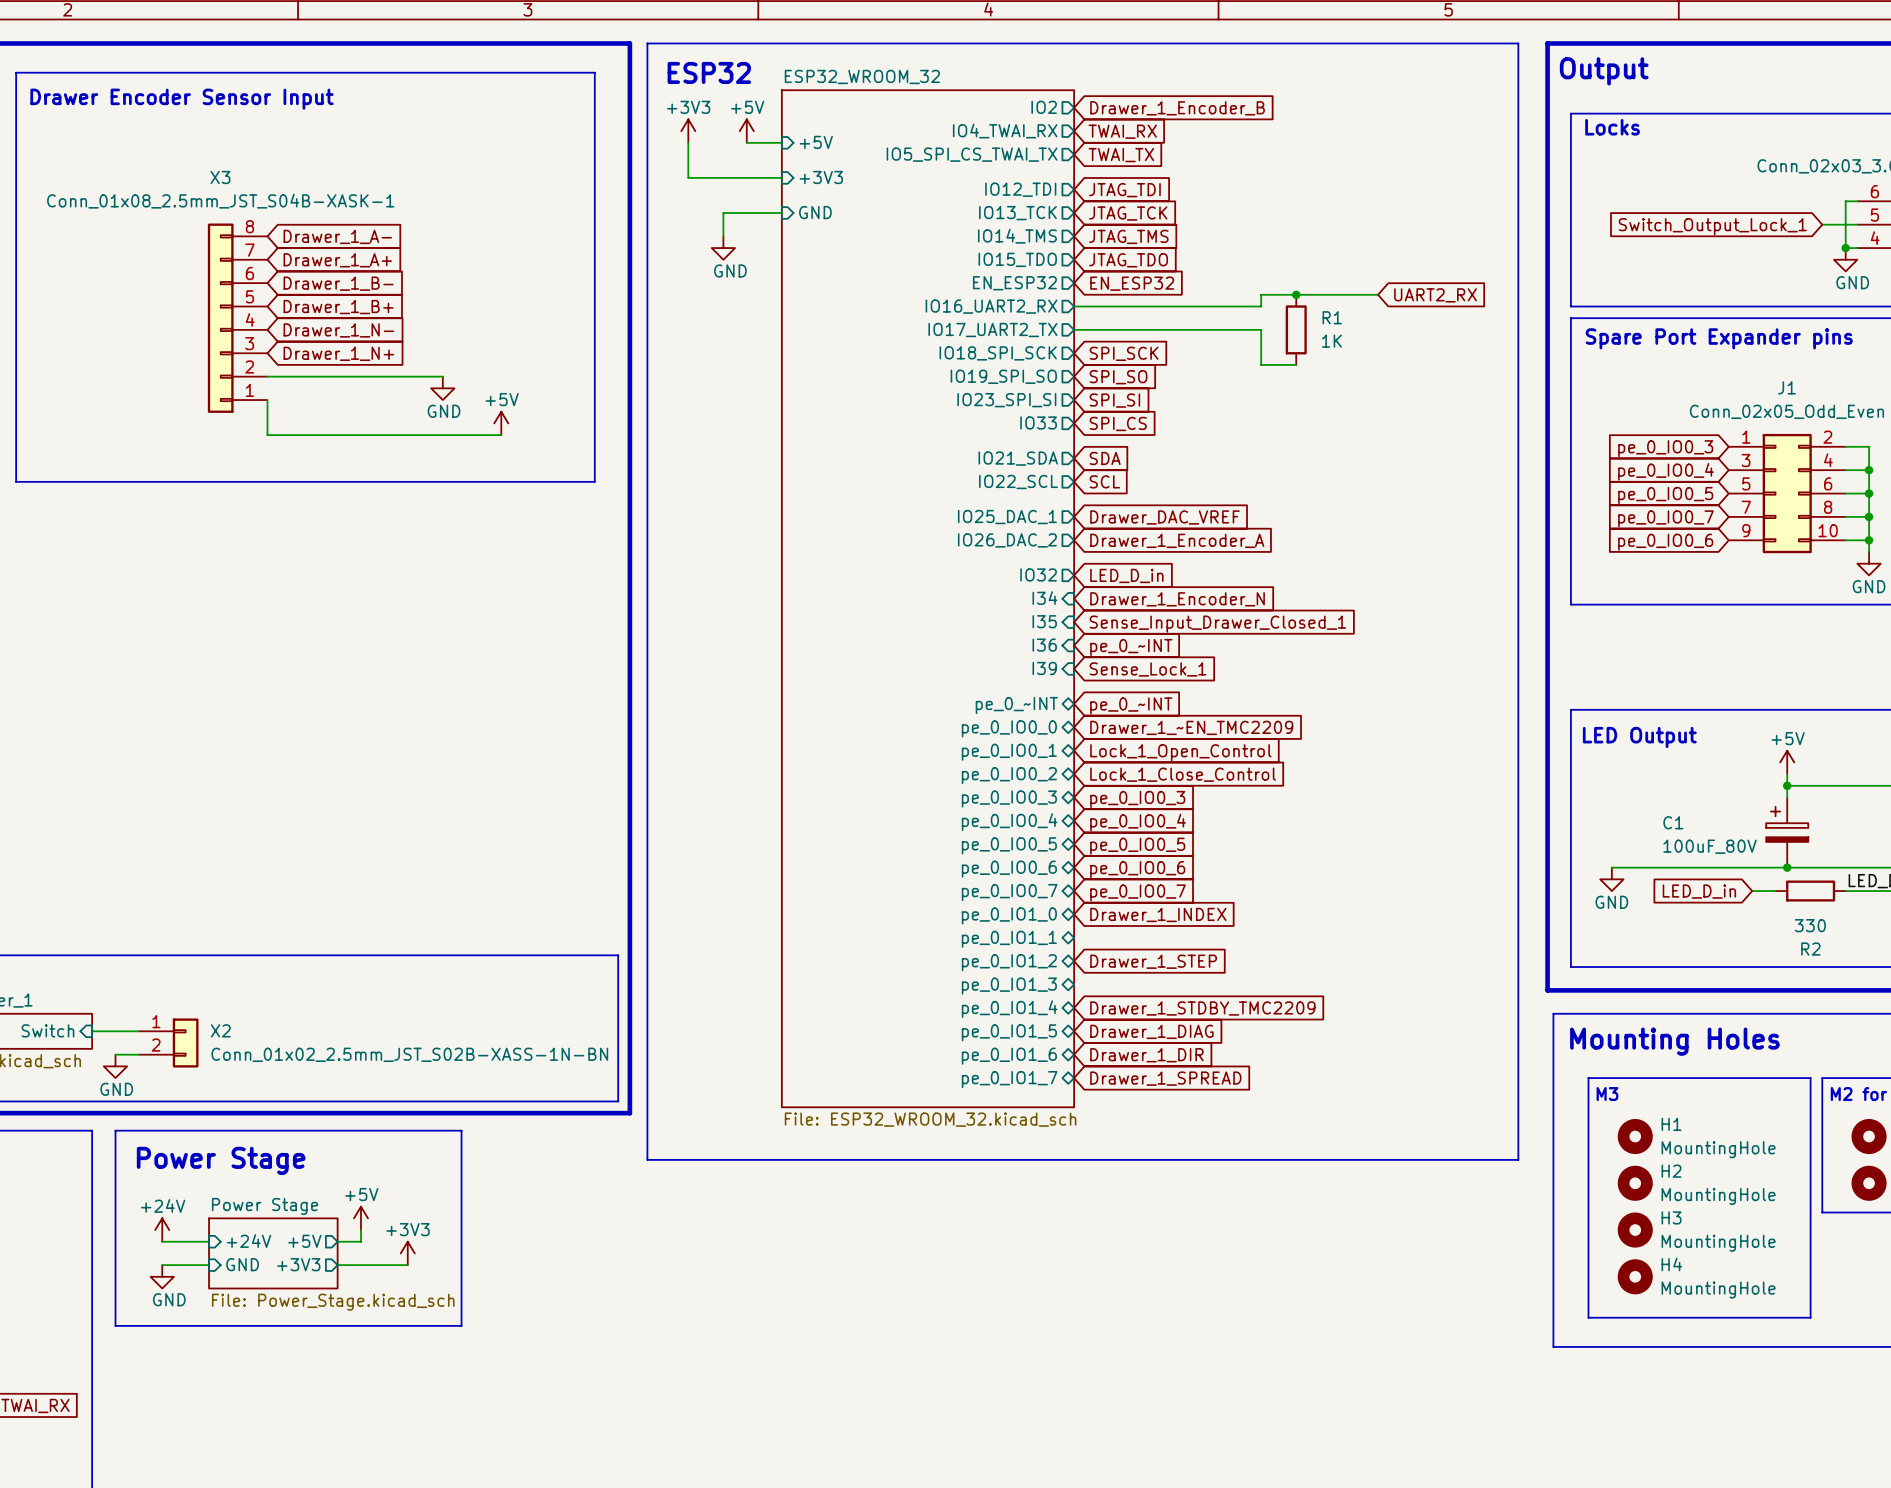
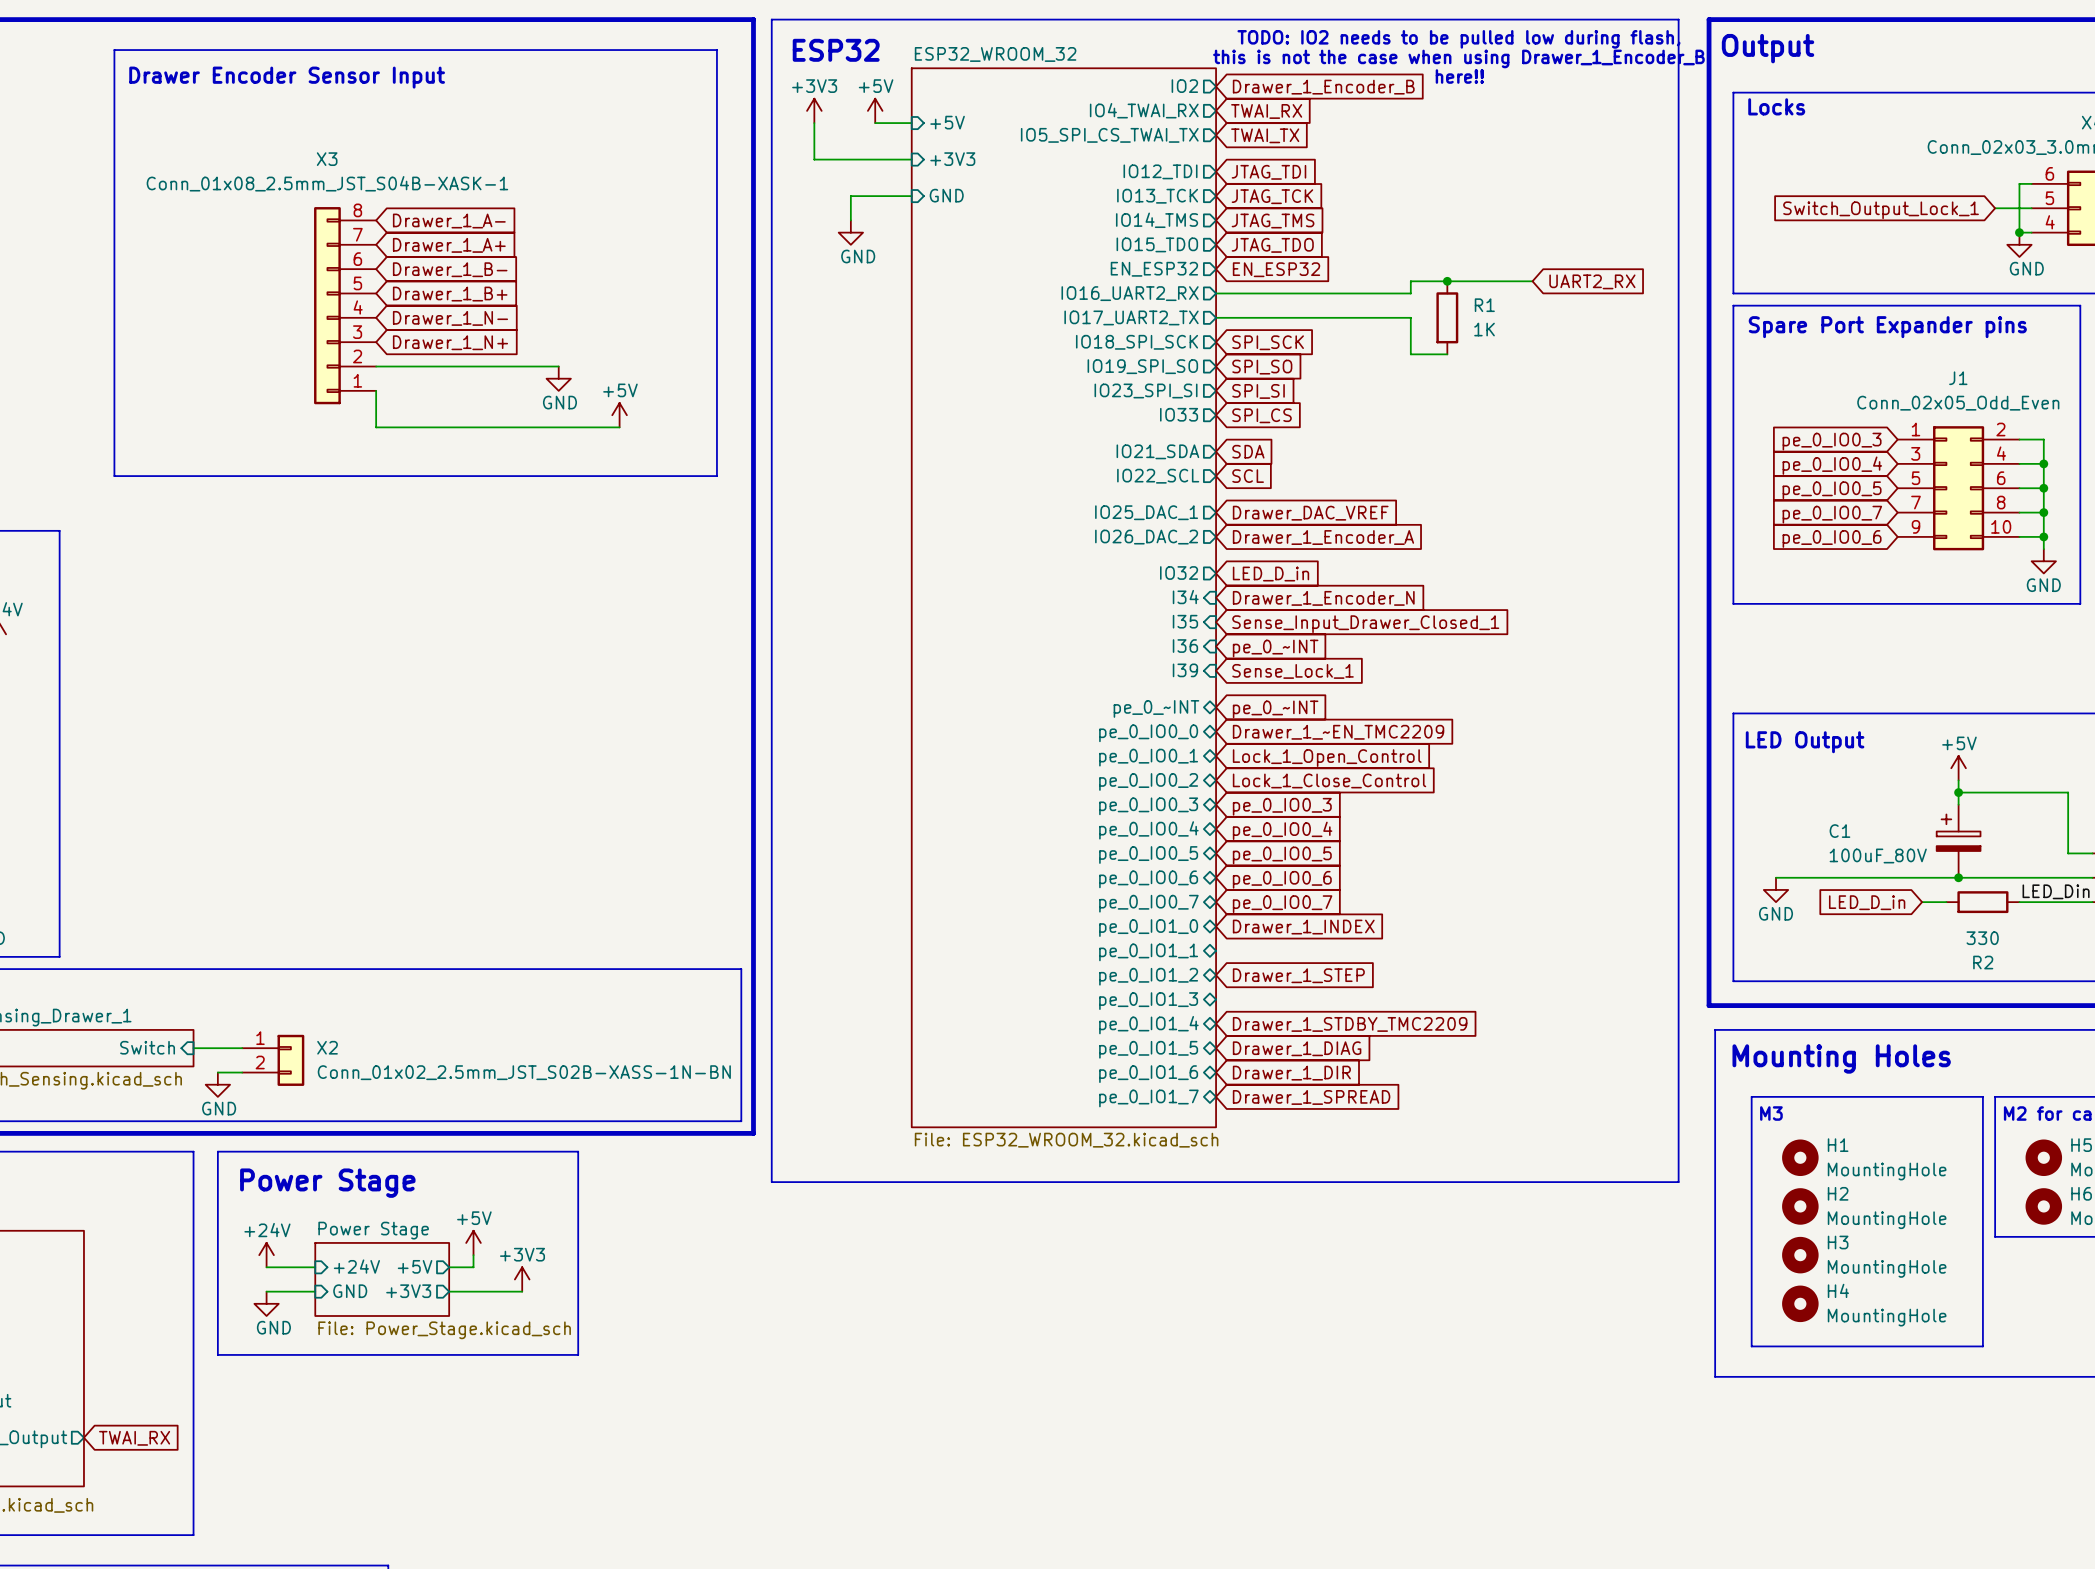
text: none -> TODO: IO2 needs to be pulled low during flash, (1458, 39)
text: none -> this is not the case when using Drawer_1_Encoder_B (1458, 58)
text: none -> here!! (1459, 76)

